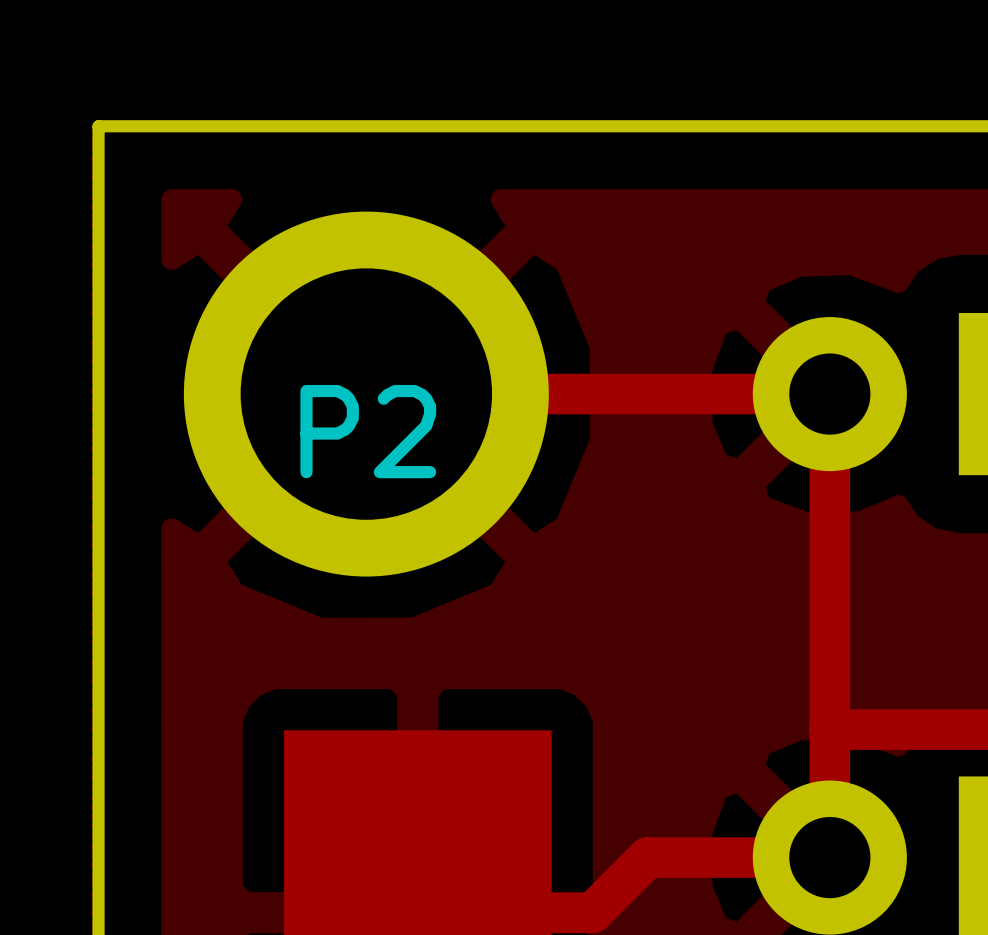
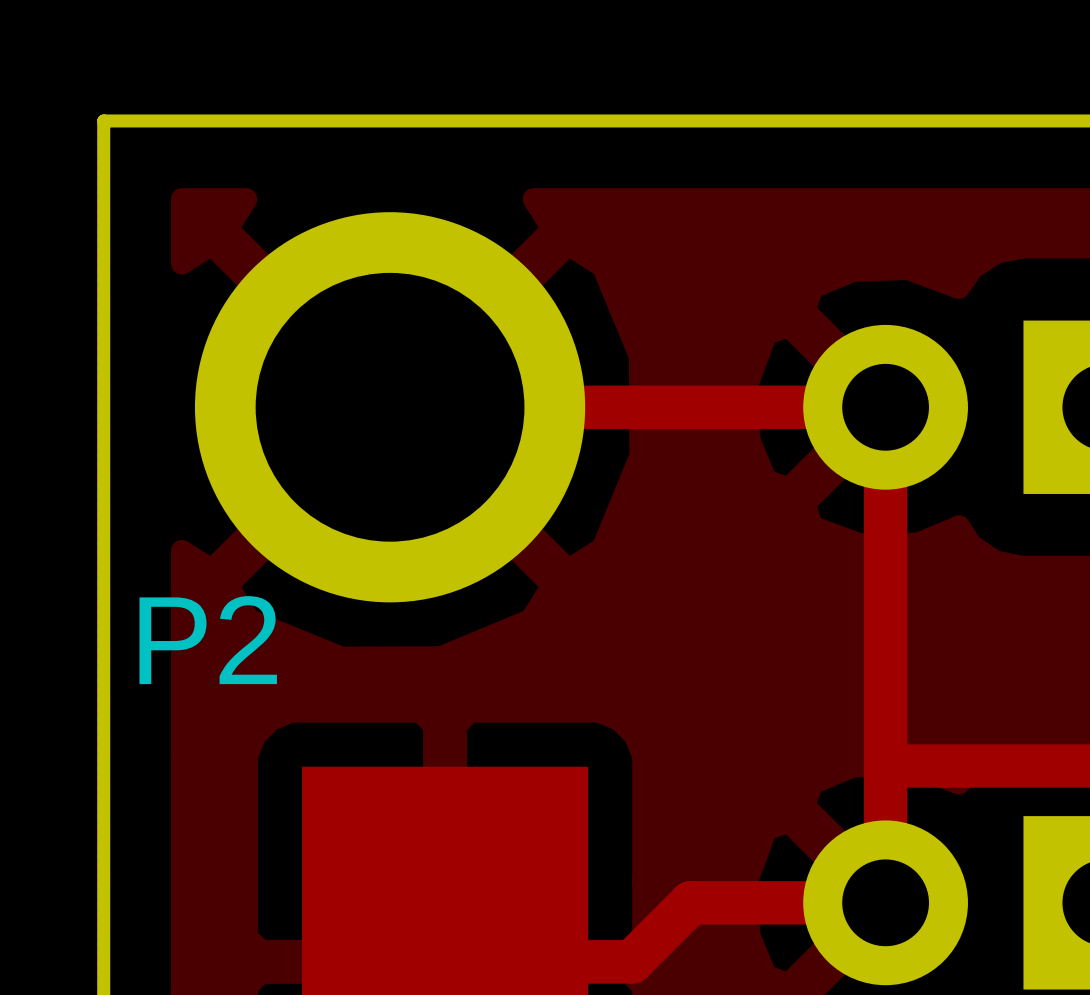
P2 name position: P2 (368, 431) -> P2 (208, 640)

